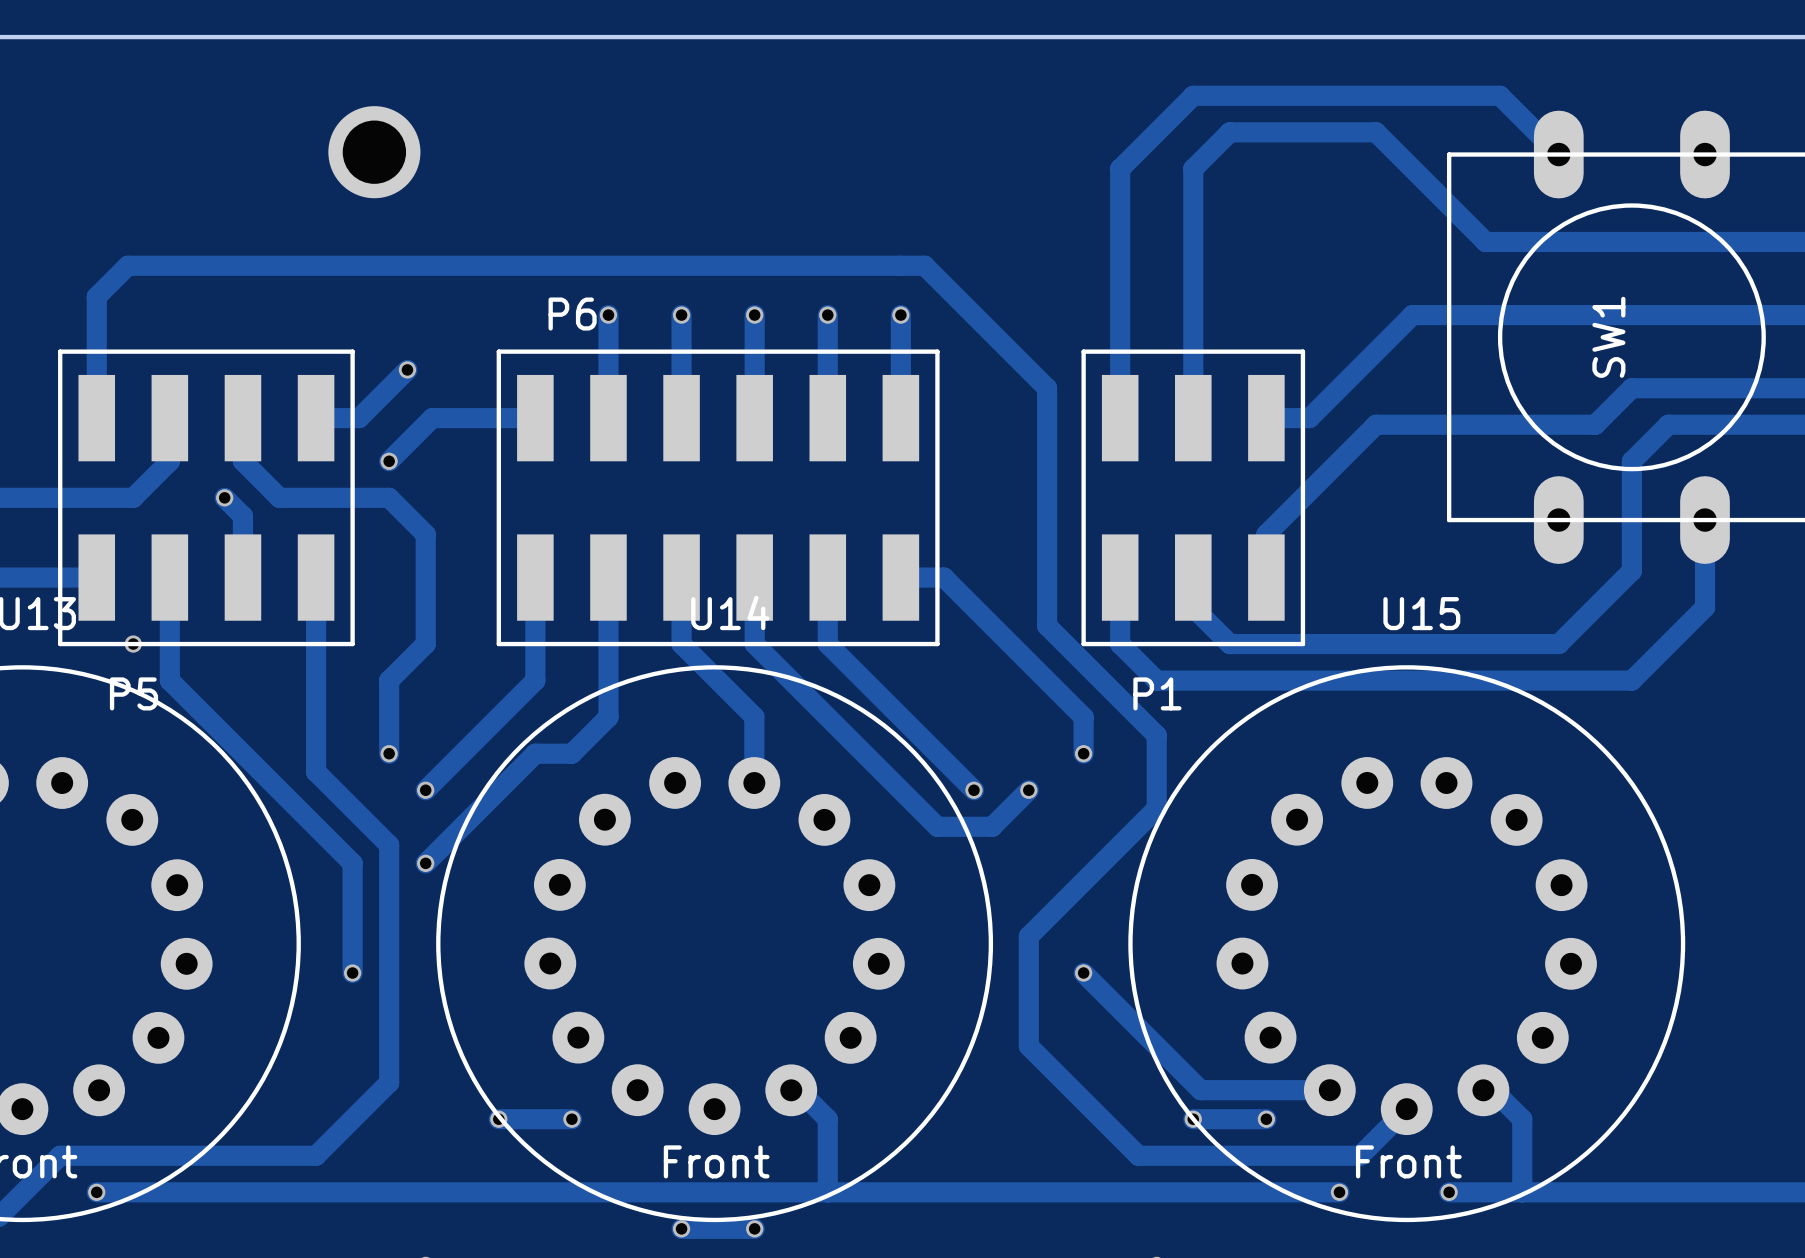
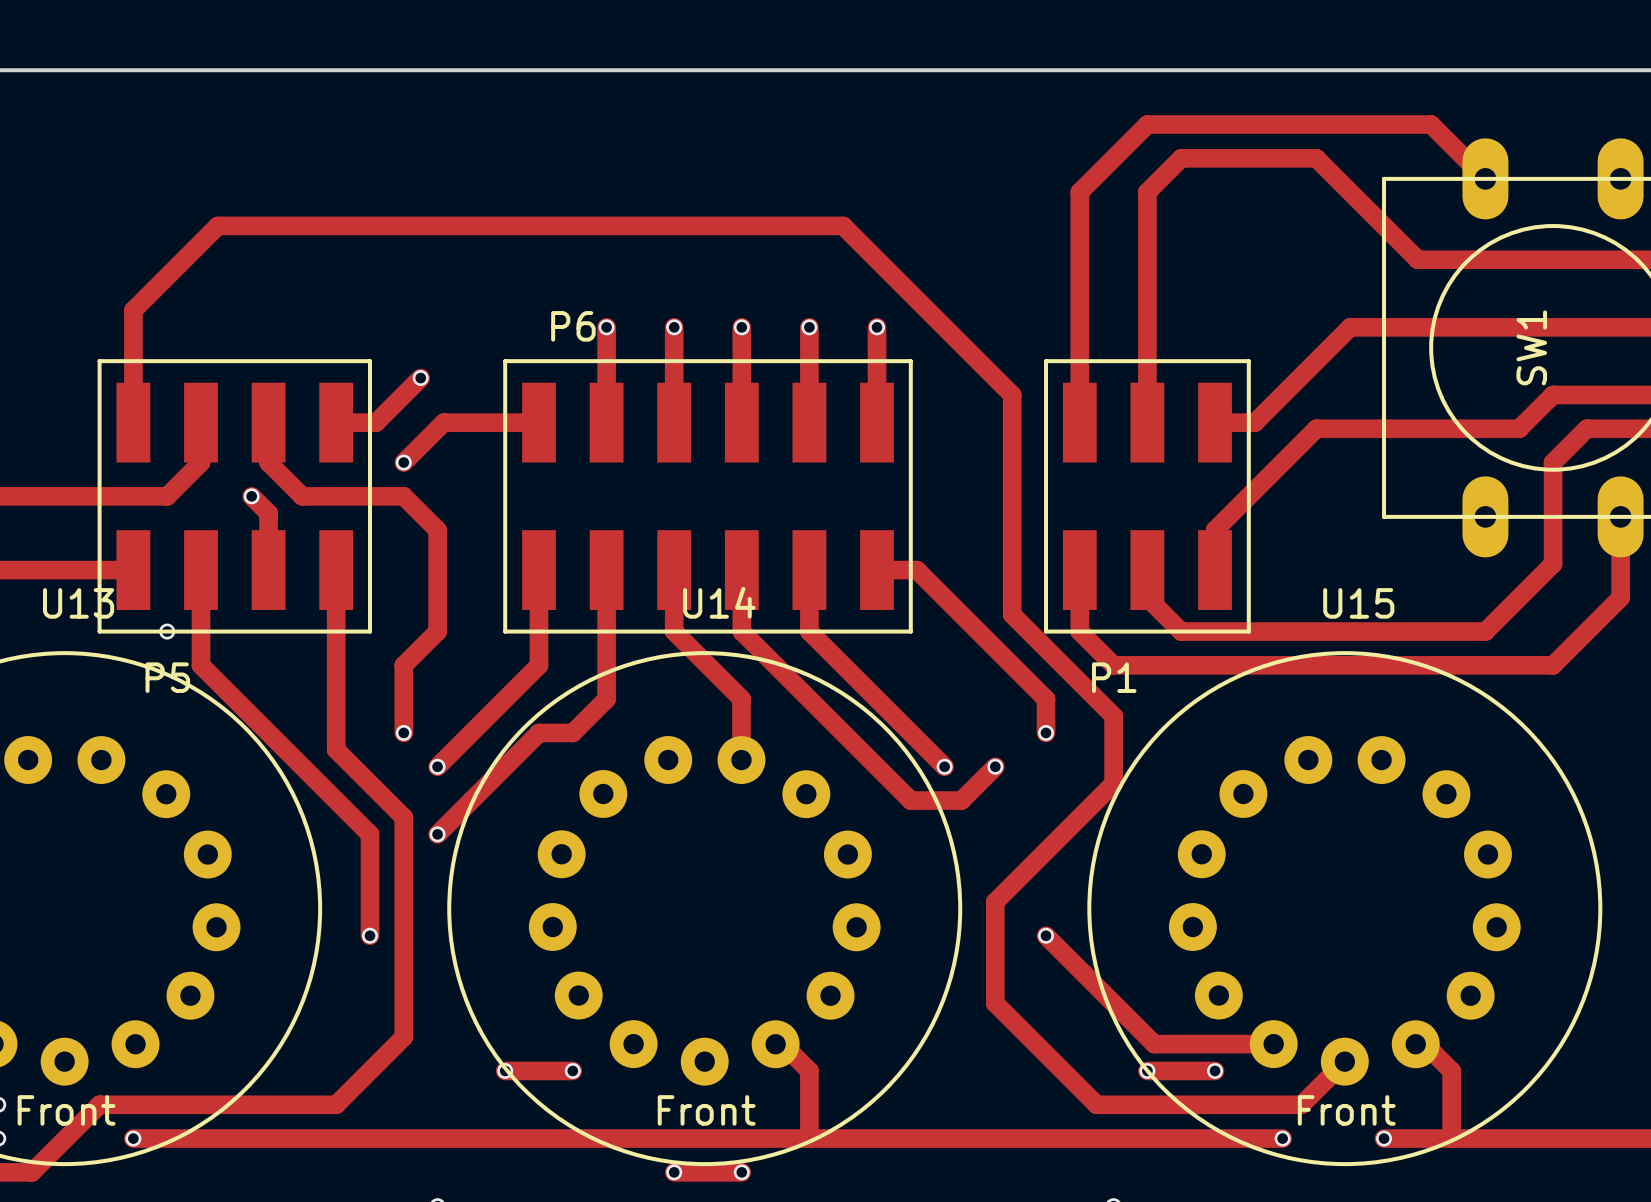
part: (374, 152) -> none
track: (127, 265) (924, 265) -> (162, 281) (217, 225) (843, 225) (898, 281)

